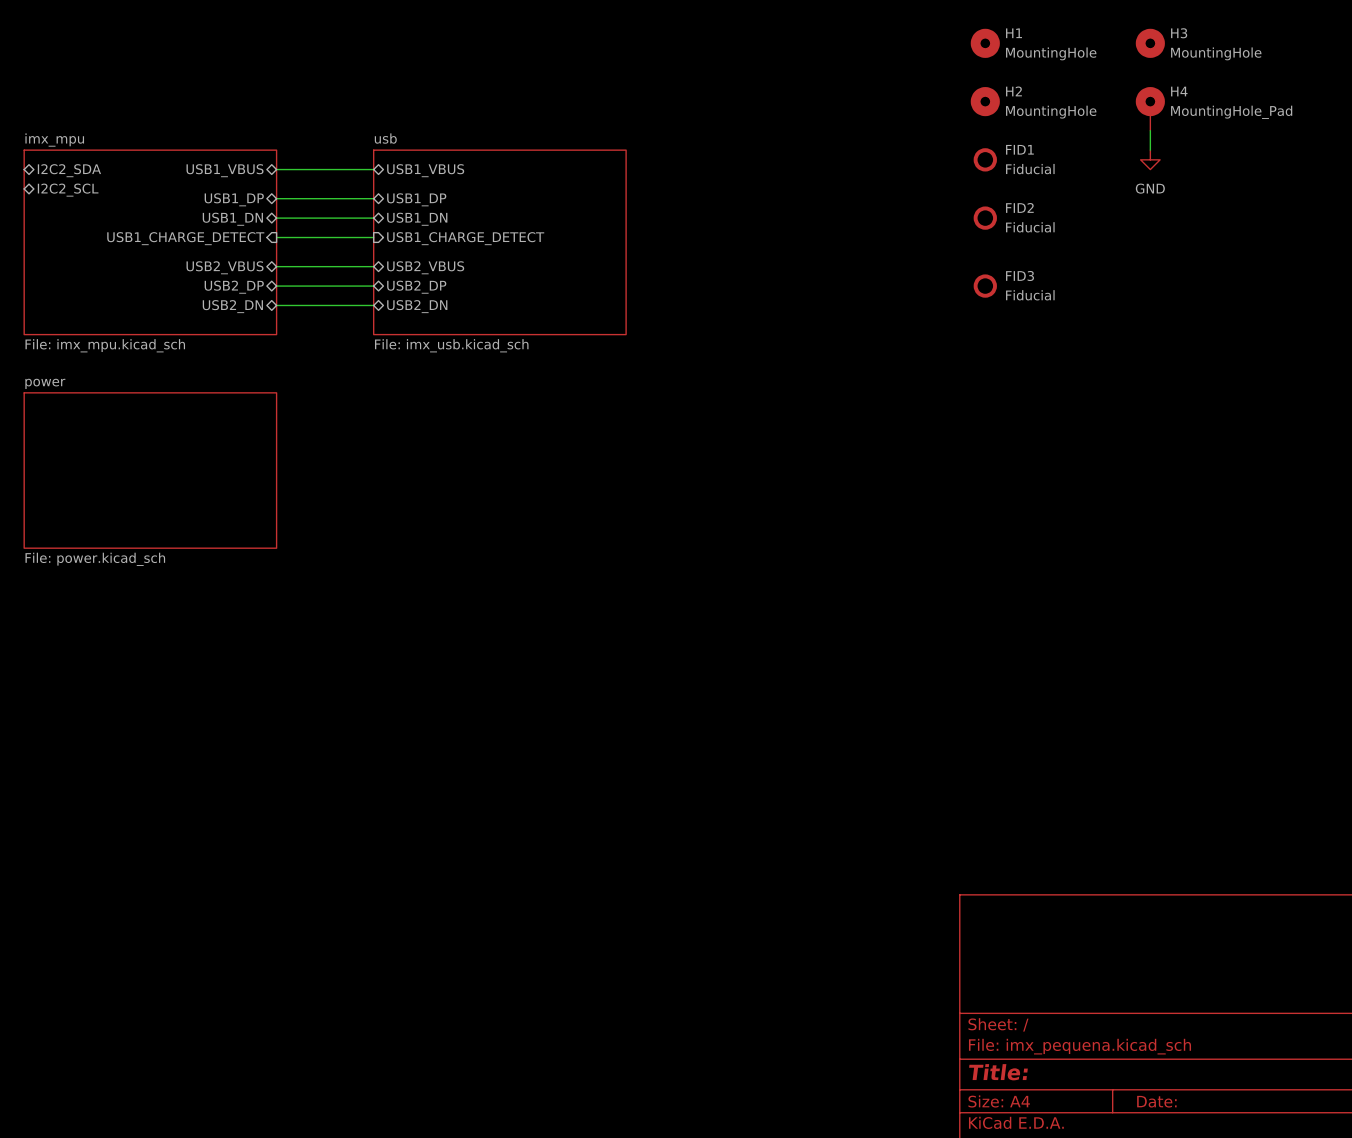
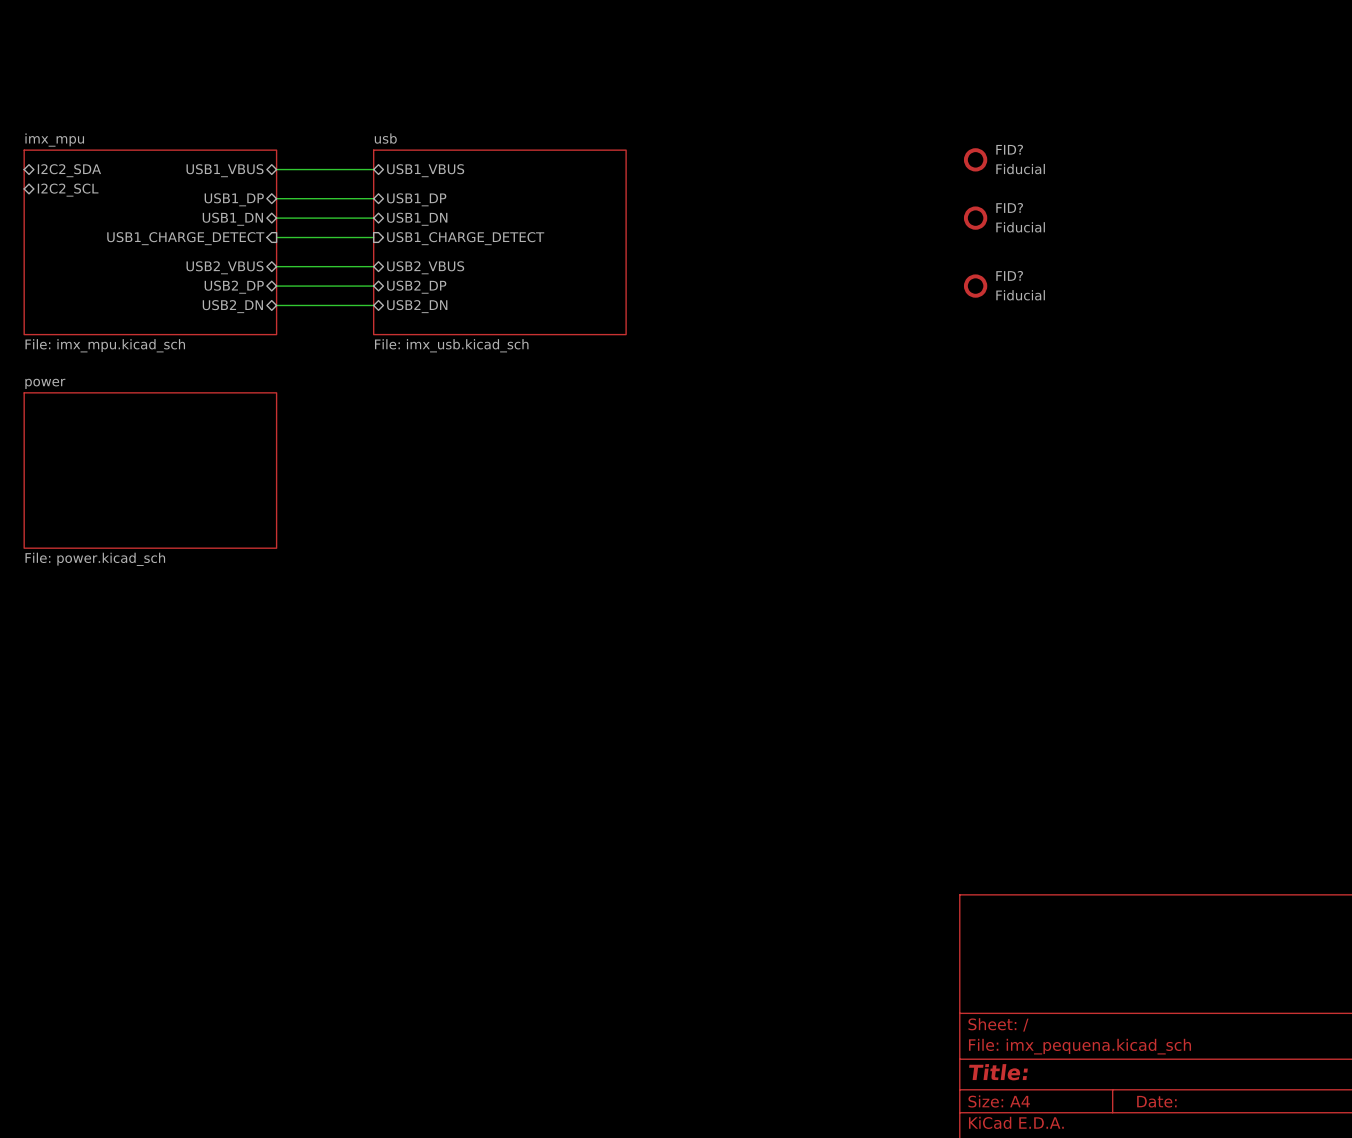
H1: MountingHole (985, 43) -> none
H3: MountingHole (1150, 43) -> none
H2: MountingHole (985, 101) -> none
H4: MountingHole_Pad (1150, 108) -> none
wire: (1150, 130) (1150, 150) -> none
FID?: none -> Fiducial (975, 159)
FID1: Fiducial (985, 159) -> none
power symbol: GND (1150, 159) -> none
FID?: none -> Fiducial (975, 218)
FID2: Fiducial (985, 218) -> none
FID?: none -> Fiducial (975, 286)
FID3: Fiducial (985, 286) -> none

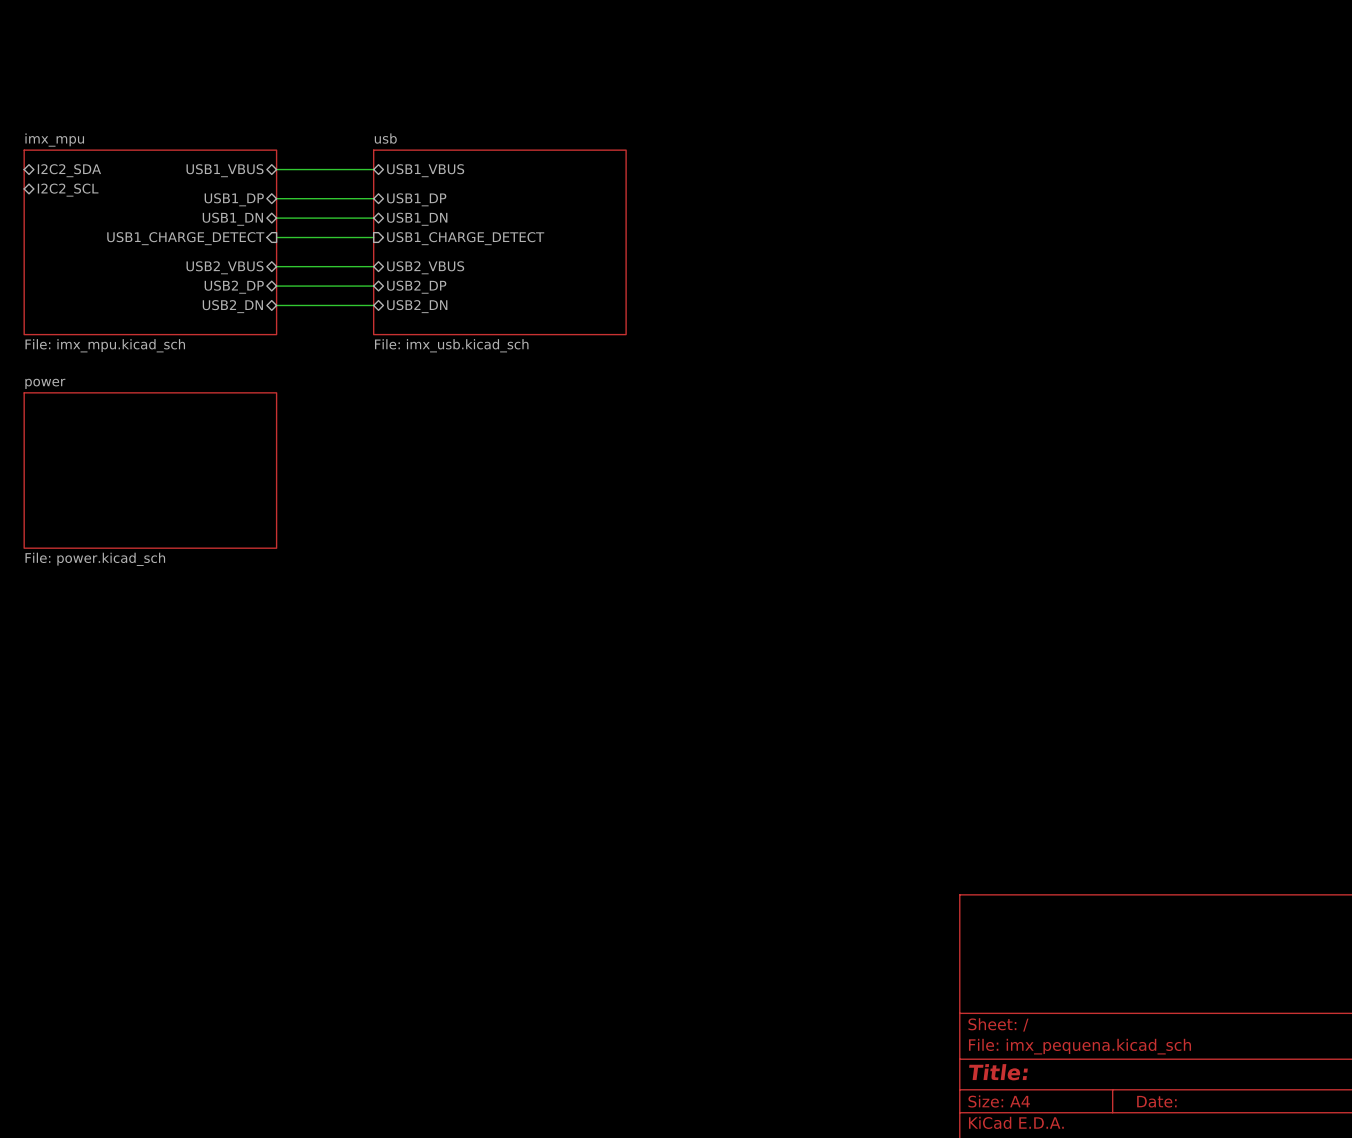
FID?: Fiducial (975, 159) -> none
FID?: Fiducial (975, 218) -> none
FID?: Fiducial (975, 286) -> none

